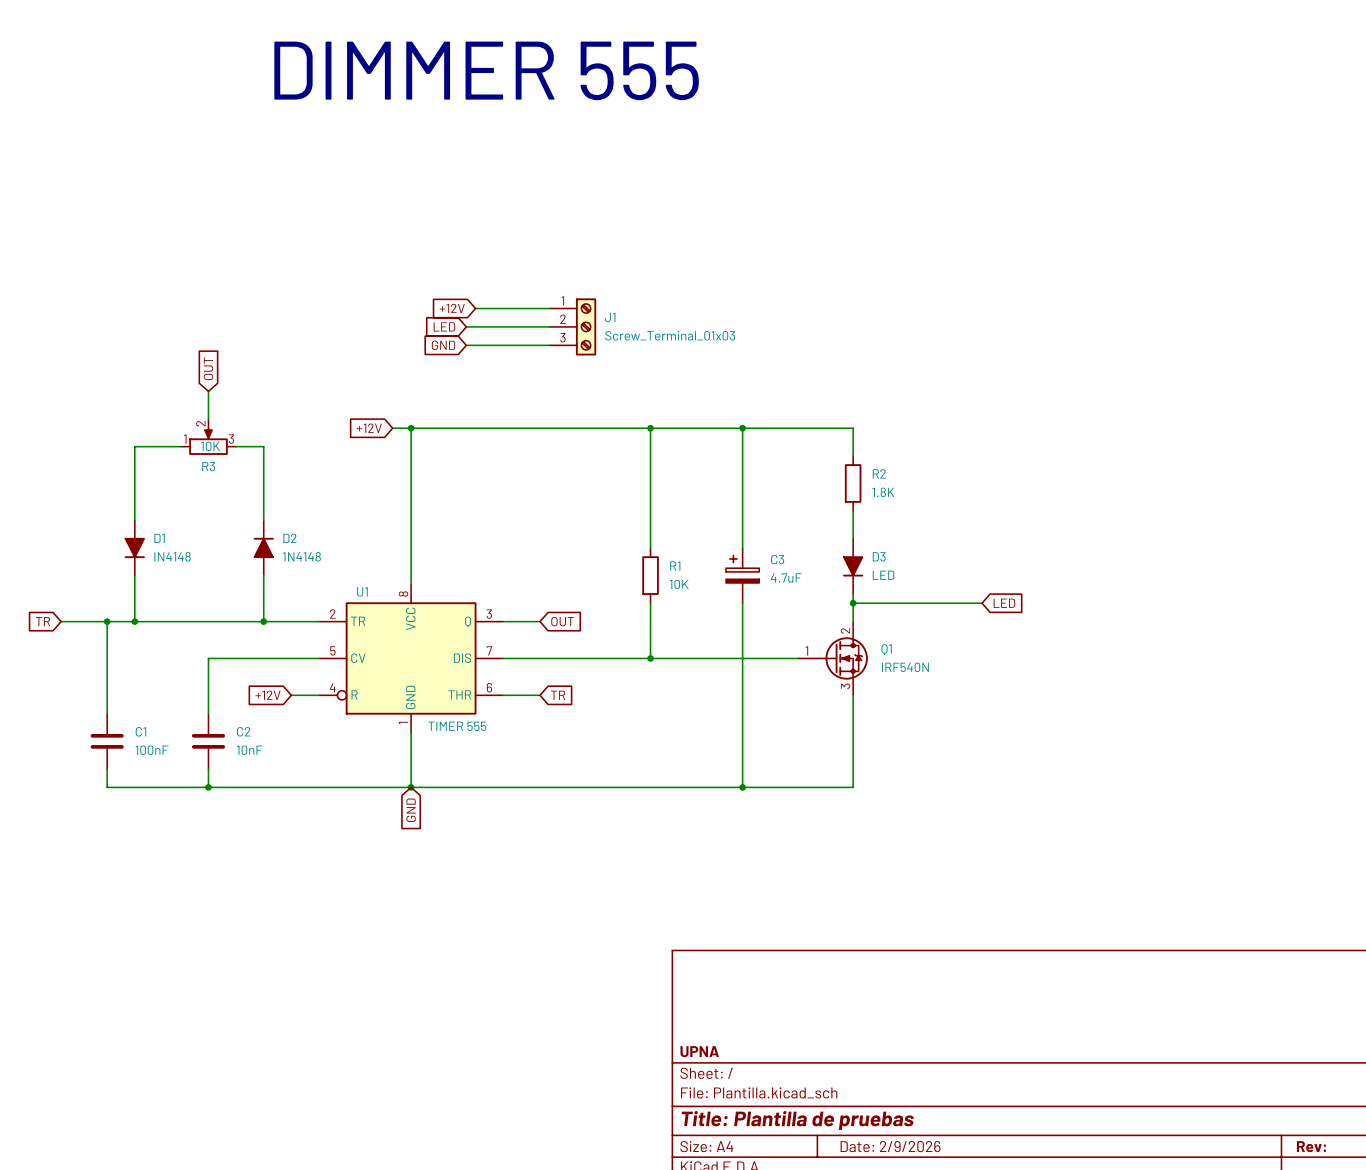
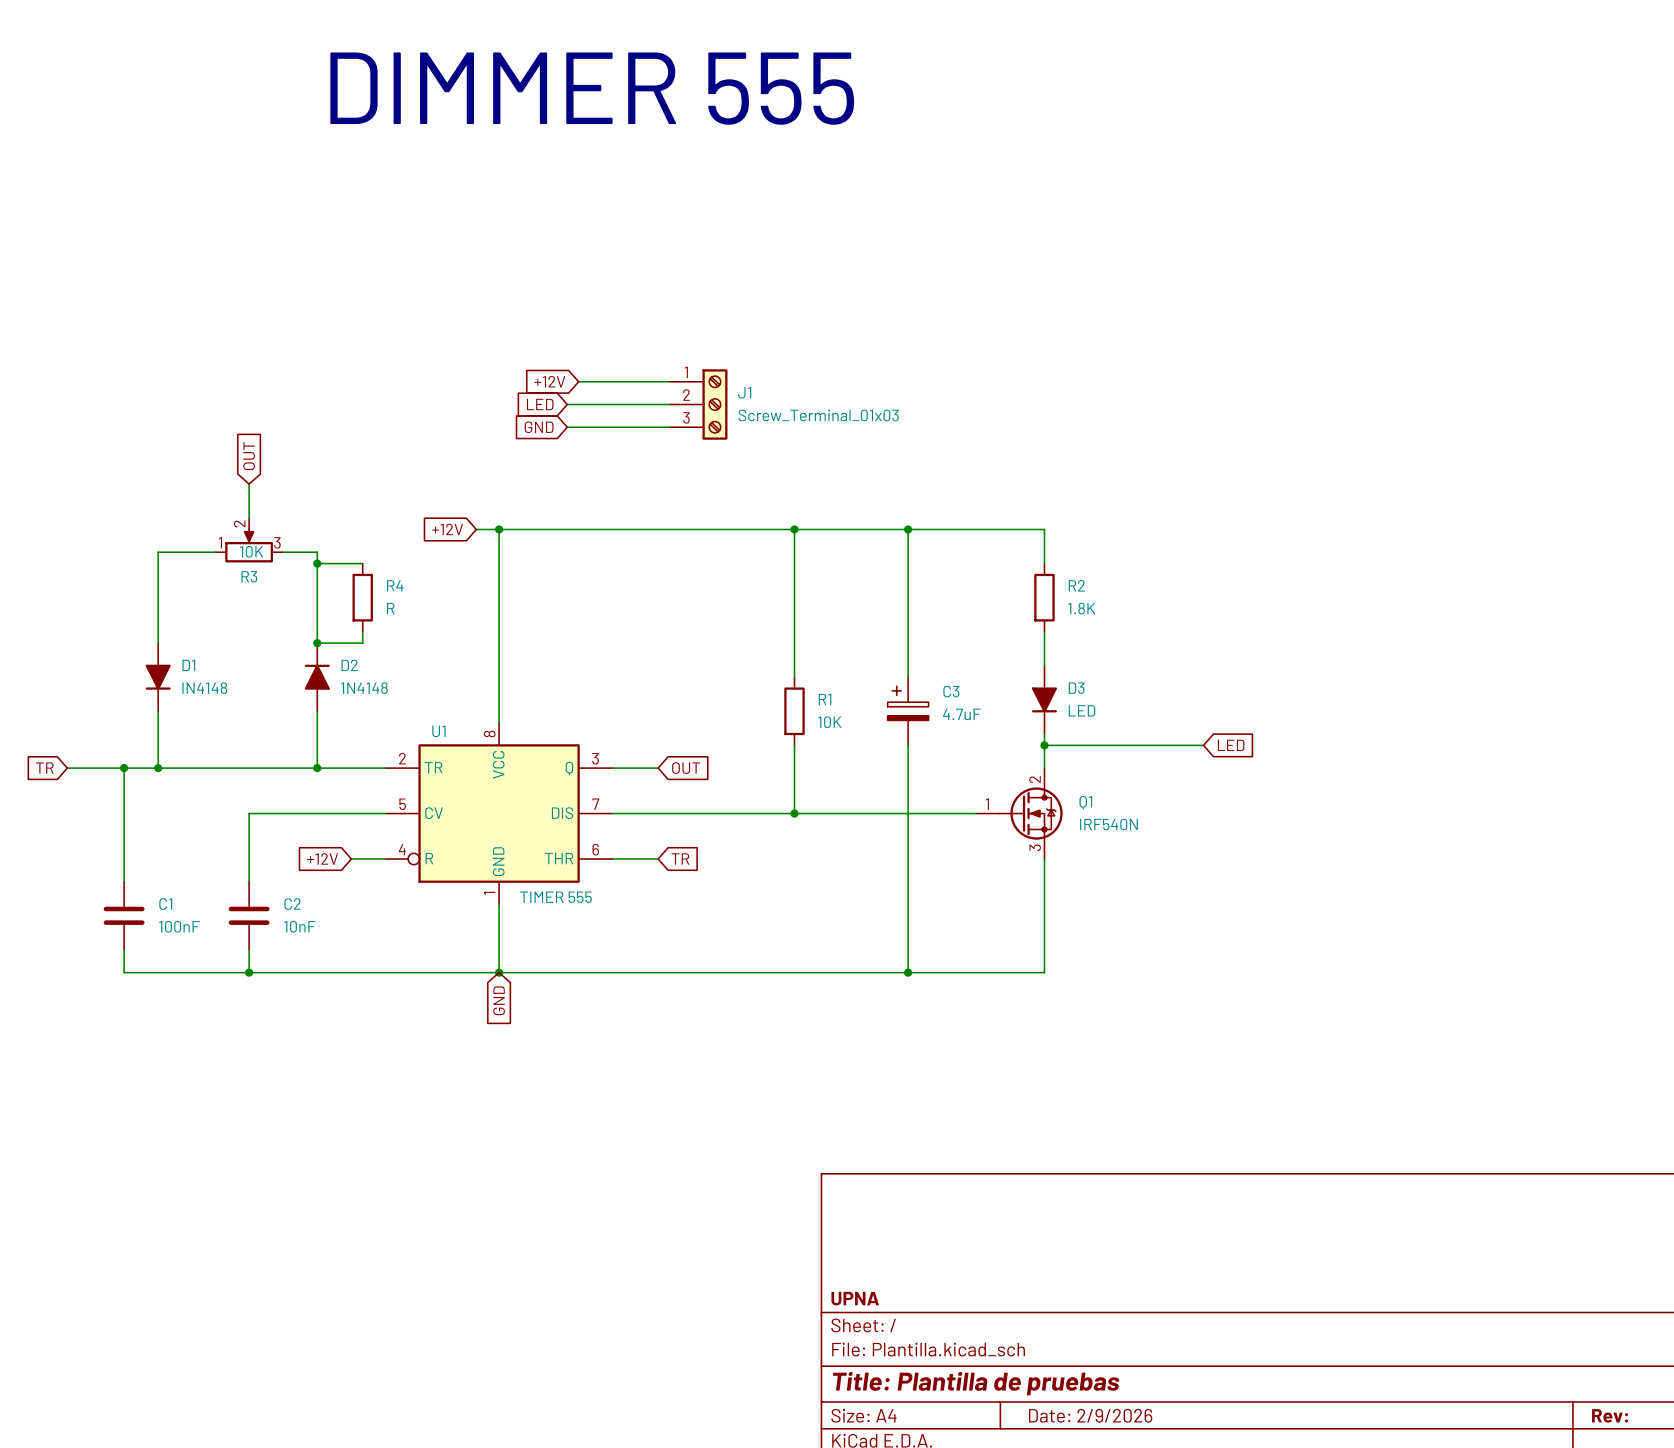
wire: none -> (317, 563) (362, 563)
junction: none -> (317, 563)
R4: none -> R (362, 597)
wire: none -> (362, 631) (362, 643) (317, 643)
junction: none -> (317, 643)

